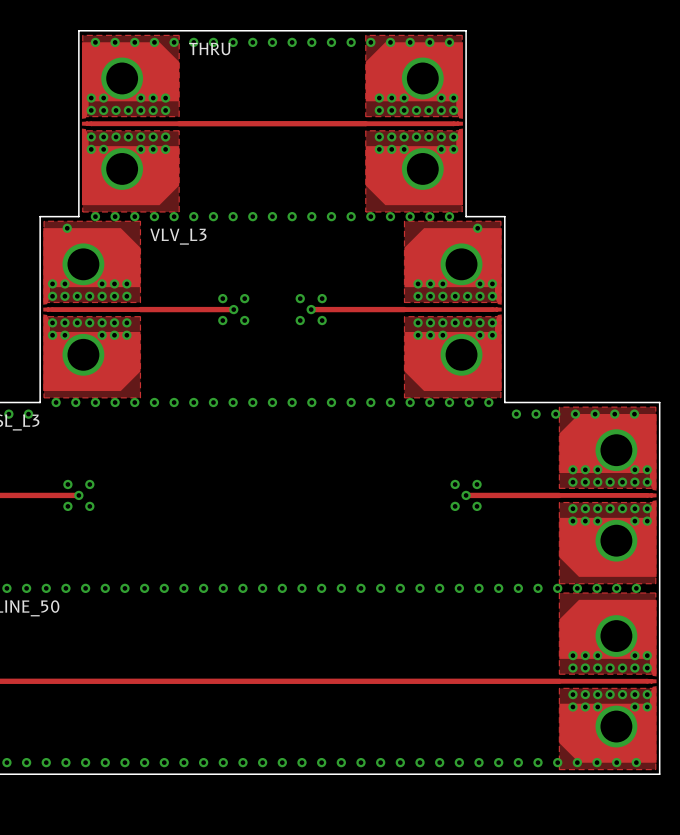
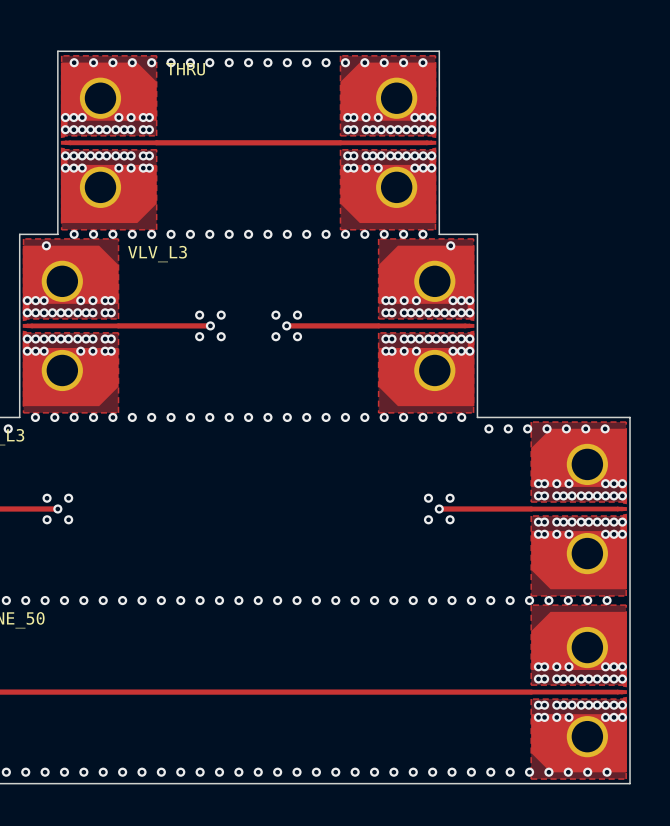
via: none -> (65, 117)
via: (91, 98) -> none
via: none -> (73, 117)
via: none -> (149, 117)
via: none -> (347, 117)
via: none -> (423, 117)
via: (453, 98) -> none
via: none -> (431, 117)
via: none -> (65, 129)
via: (91, 110) -> none
via: none -> (73, 129)
via: none -> (90, 129)
via: (116, 110) -> none
via: none -> (99, 129)
via: none -> (115, 129)
via: (140, 110) -> none
via: none -> (124, 129)
via: none -> (149, 129)
via: none -> (347, 129)
via: none -> (372, 129)
via: (404, 110) -> none
via: none -> (381, 129)
via: none -> (398, 129)
via: (428, 110) -> none
via: none -> (406, 129)
via: none -> (423, 129)
via: (453, 110) -> none
via: none -> (431, 129)
via: none -> (65, 155)
via: (91, 136) -> none
via: none -> (73, 155)
via: none -> (90, 155)
via: (116, 136) -> none
via: none -> (99, 155)
via: none -> (115, 155)
via: (140, 136) -> none
via: none -> (124, 155)
via: none -> (149, 155)
via: none -> (347, 155)
via: none -> (372, 155)
via: (404, 136) -> none
via: none -> (381, 155)
via: none -> (398, 155)
via: (428, 136) -> none
via: none -> (406, 155)
via: none -> (423, 155)
via: (453, 136) -> none
via: none -> (431, 155)
via: none -> (65, 168)
via: (91, 149) -> none
via: none -> (73, 168)
via: none -> (149, 168)
via: none -> (347, 168)
via: none -> (423, 168)
via: (453, 149) -> none
via: none -> (431, 168)
via: none -> (27, 300)
via: (52, 283) -> none
via: none -> (35, 300)
via: none -> (111, 300)
via: none -> (385, 300)
via: none -> (461, 300)
via: (492, 283) -> none
via: none -> (469, 300)
via: none -> (27, 312)
via: (52, 296) -> none
via: none -> (35, 312)
via: none -> (52, 312)
via: (77, 296) -> none
via: none -> (60, 312)
via: none -> (77, 312)
via: (102, 296) -> none
via: none -> (86, 312)
via: none -> (111, 312)
via: none -> (385, 312)
via: none -> (411, 312)
via: (442, 296) -> none
via: none -> (419, 312)
via: none -> (436, 312)
via: (467, 296) -> none
via: none -> (444, 312)
via: none -> (461, 312)
via: (492, 296) -> none
via: none -> (469, 312)
via: none -> (27, 338)
via: (52, 322) -> none
via: none -> (35, 338)
via: none -> (52, 338)
via: (77, 322) -> none
via: none -> (60, 338)
via: none -> (77, 338)
via: (102, 322) -> none
via: none -> (86, 338)
via: none -> (111, 338)
via: none -> (385, 338)
via: none -> (411, 338)
via: (442, 322) -> none
via: none -> (419, 338)
via: none -> (436, 338)
via: (467, 322) -> none
via: none -> (444, 338)
via: none -> (461, 338)
via: (492, 322) -> none
via: none -> (469, 338)
via: none -> (27, 351)
via: (52, 335) -> none
via: none -> (35, 351)
via: none -> (111, 351)
via: none -> (385, 351)
via: none -> (461, 351)
via: (492, 335) -> none
via: none -> (469, 351)
via: none -> (538, 483)
via: none -> (613, 483)
via: (647, 469) -> none
via: none -> (622, 483)
via: none -> (538, 495)
via: none -> (563, 495)
via: (597, 482) -> none
via: none -> (572, 495)
via: none -> (588, 495)
via: (622, 482) -> none
via: none -> (597, 495)
via: none -> (613, 495)
via: (647, 482) -> none
via: none -> (622, 495)
via: none -> (538, 522)
via: none -> (563, 522)
via: (597, 508) -> none
via: none -> (572, 522)
via: none -> (588, 522)
via: (622, 508) -> none
via: none -> (597, 522)
via: none -> (613, 522)
via: (647, 508) -> none
via: none -> (622, 522)
via: none -> (538, 534)
via: none -> (613, 534)
via: (647, 521) -> none
via: none -> (622, 534)
via: none -> (538, 666)
via: none -> (613, 666)
via: (647, 655) -> none
via: none -> (622, 666)
via: none -> (538, 679)
via: none -> (563, 679)
via: (597, 668) -> none
via: none -> (572, 679)
via: none -> (588, 679)
via: (622, 668) -> none
via: none -> (597, 679)
via: none -> (613, 679)
via: (647, 668) -> none
via: none -> (622, 679)
via: none -> (538, 705)
via: none -> (563, 705)
via: (597, 694) -> none
via: none -> (572, 705)
via: none -> (588, 705)
via: (622, 694) -> none
via: none -> (597, 705)
via: none -> (613, 705)
via: (647, 694) -> none
via: none -> (622, 705)
via: none -> (538, 717)
via: none -> (613, 717)
via: (647, 706) -> none
via: none -> (622, 717)

